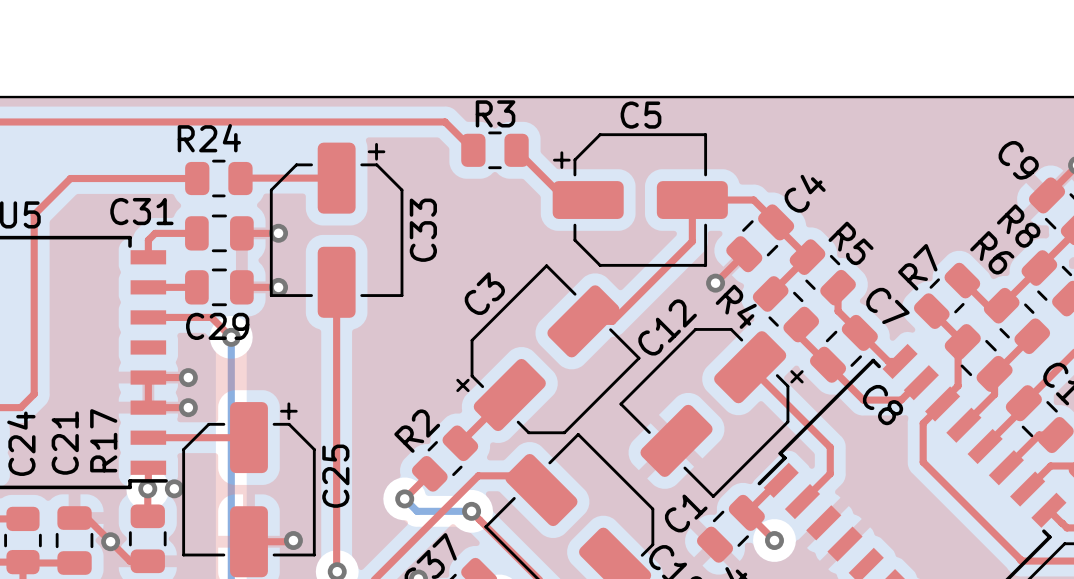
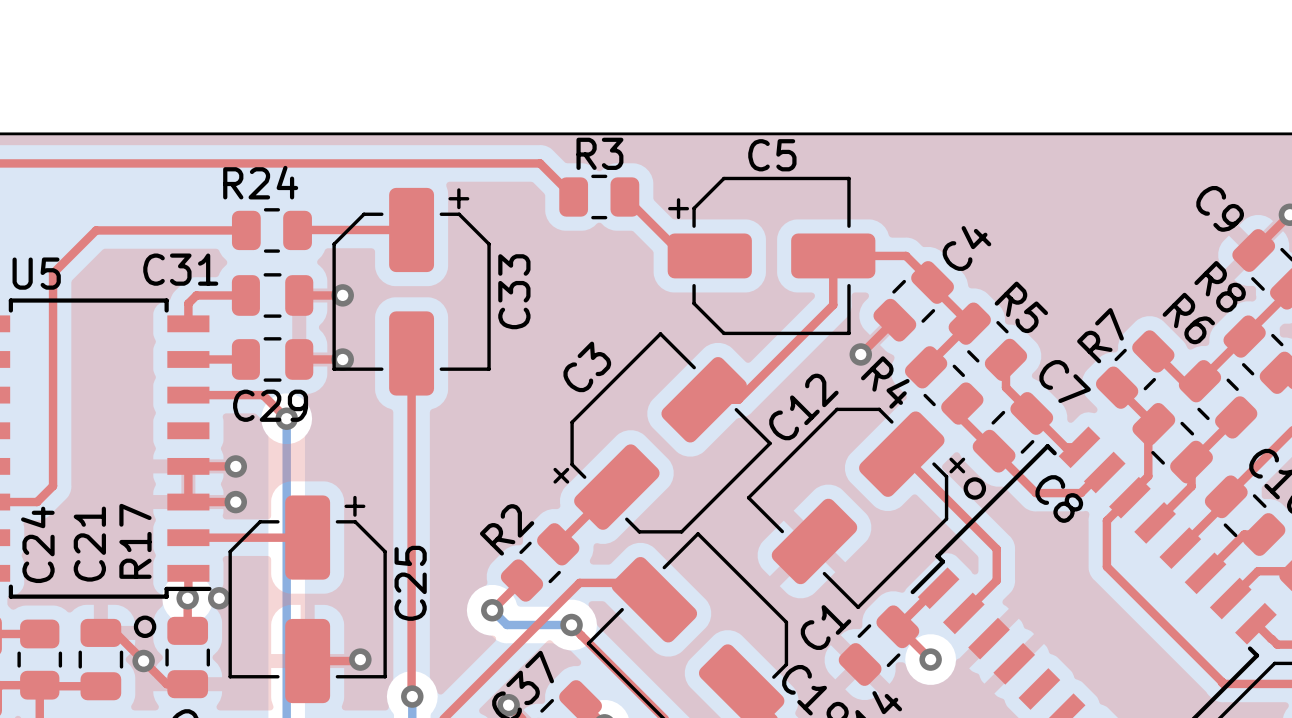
drawing: none -> [963, 477, 987, 500]
drawing: none -> [133, 615, 157, 639]

